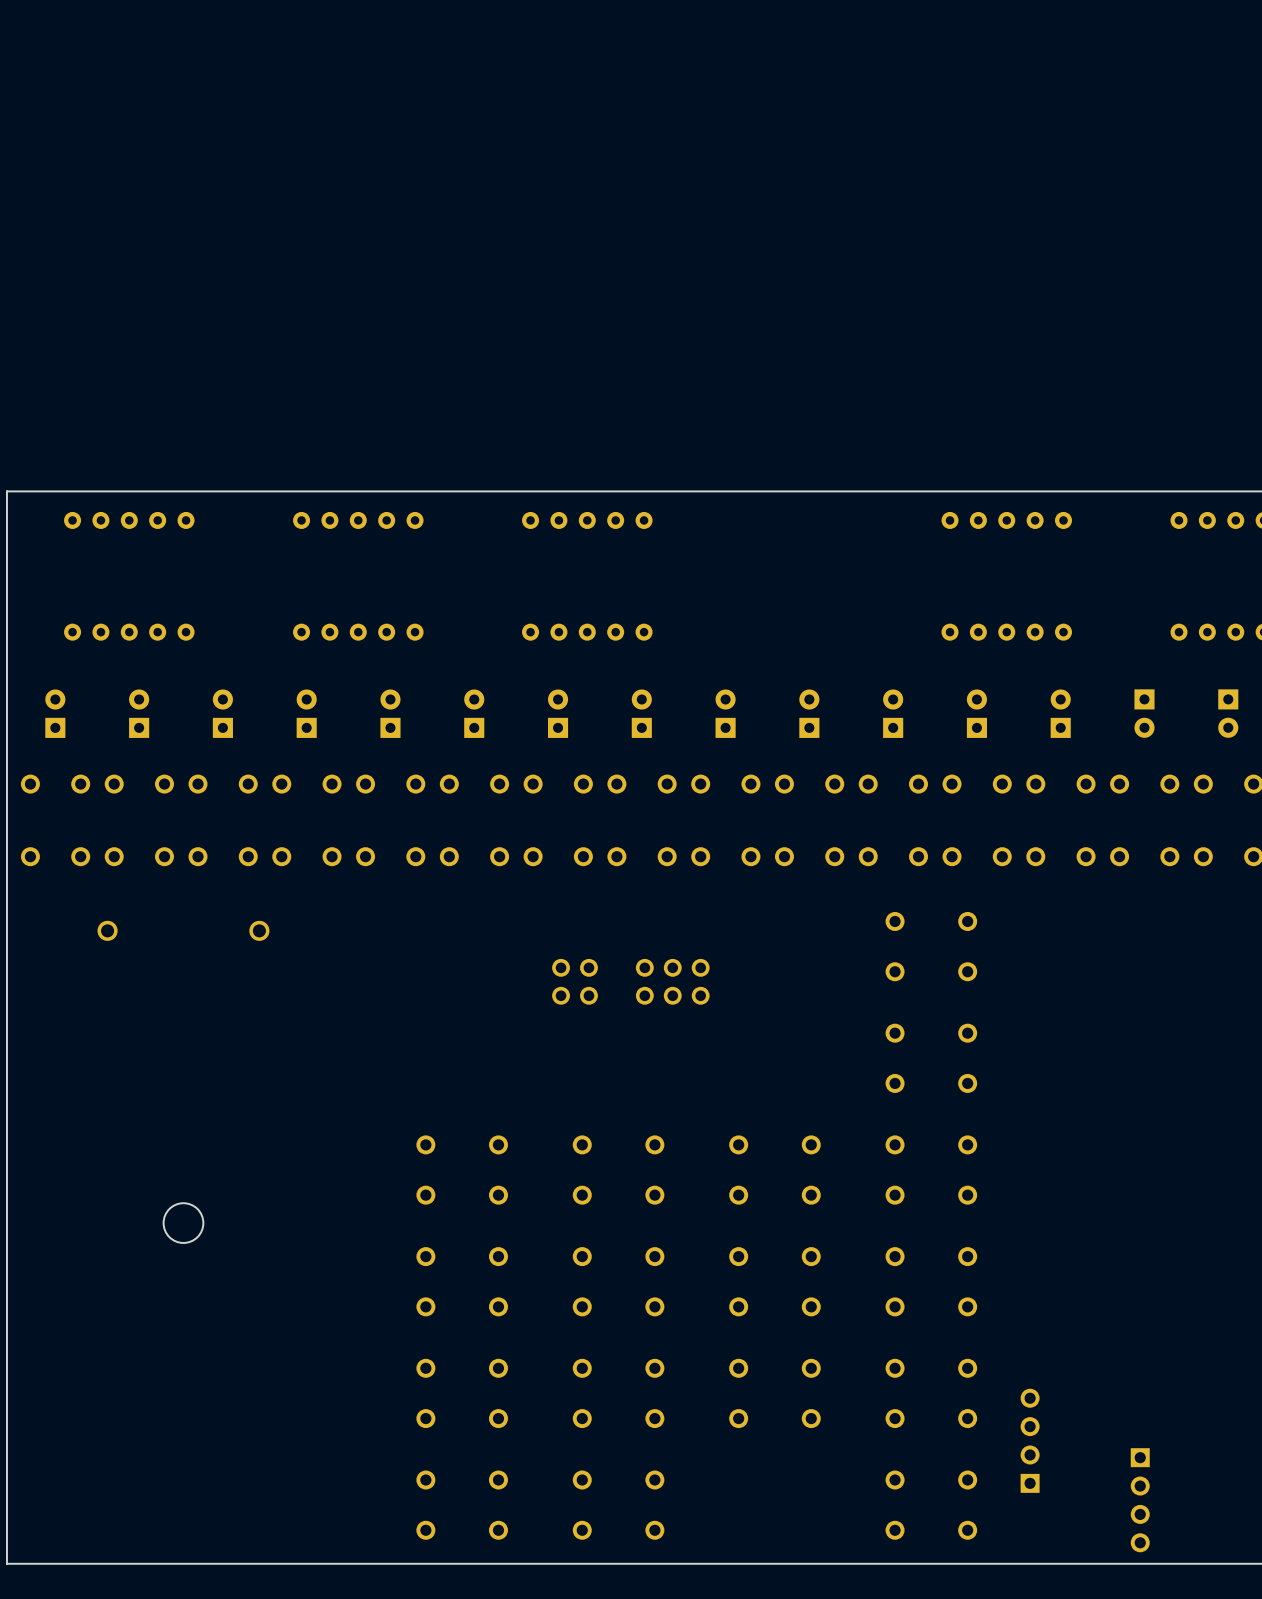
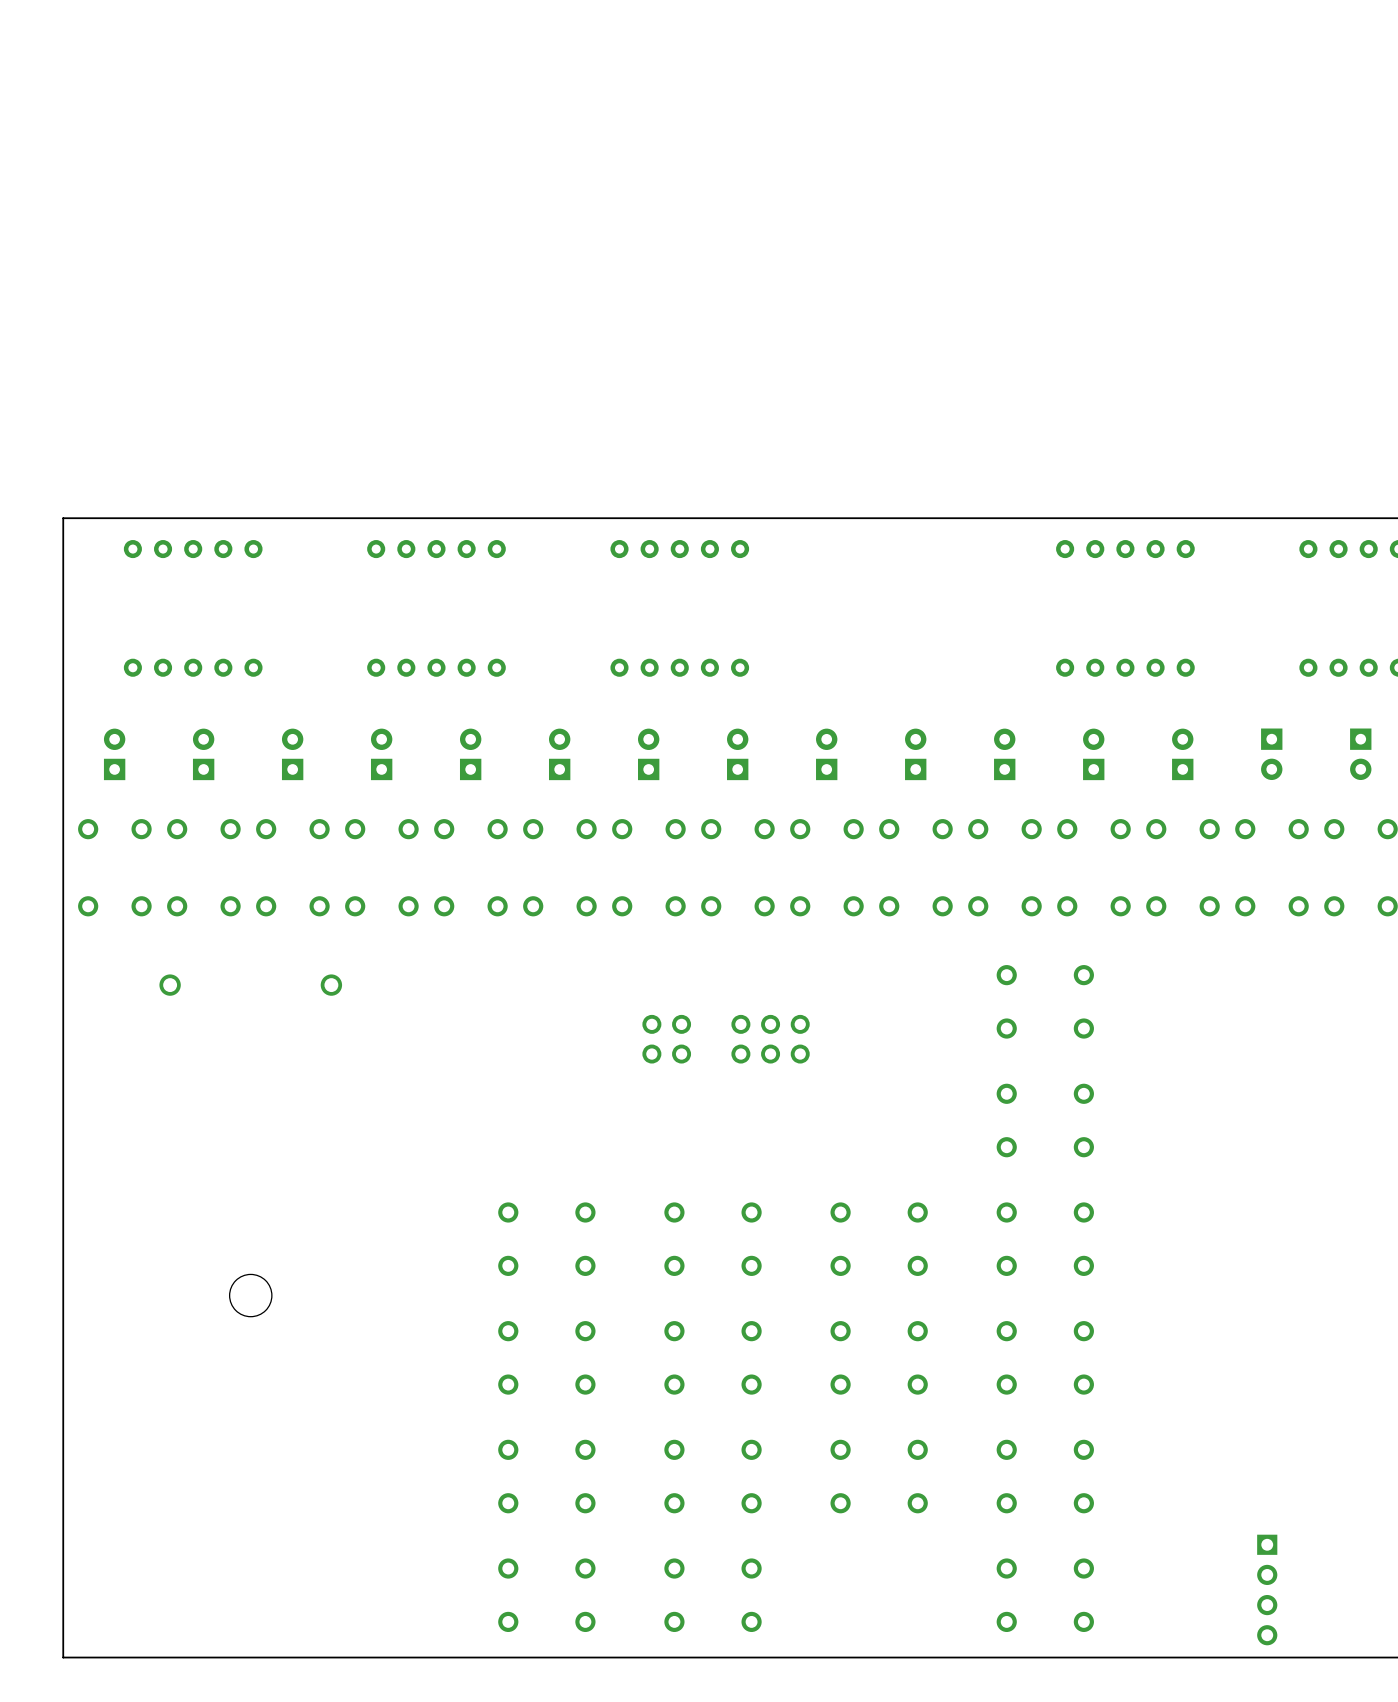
part: (1030, 1440) -> none

